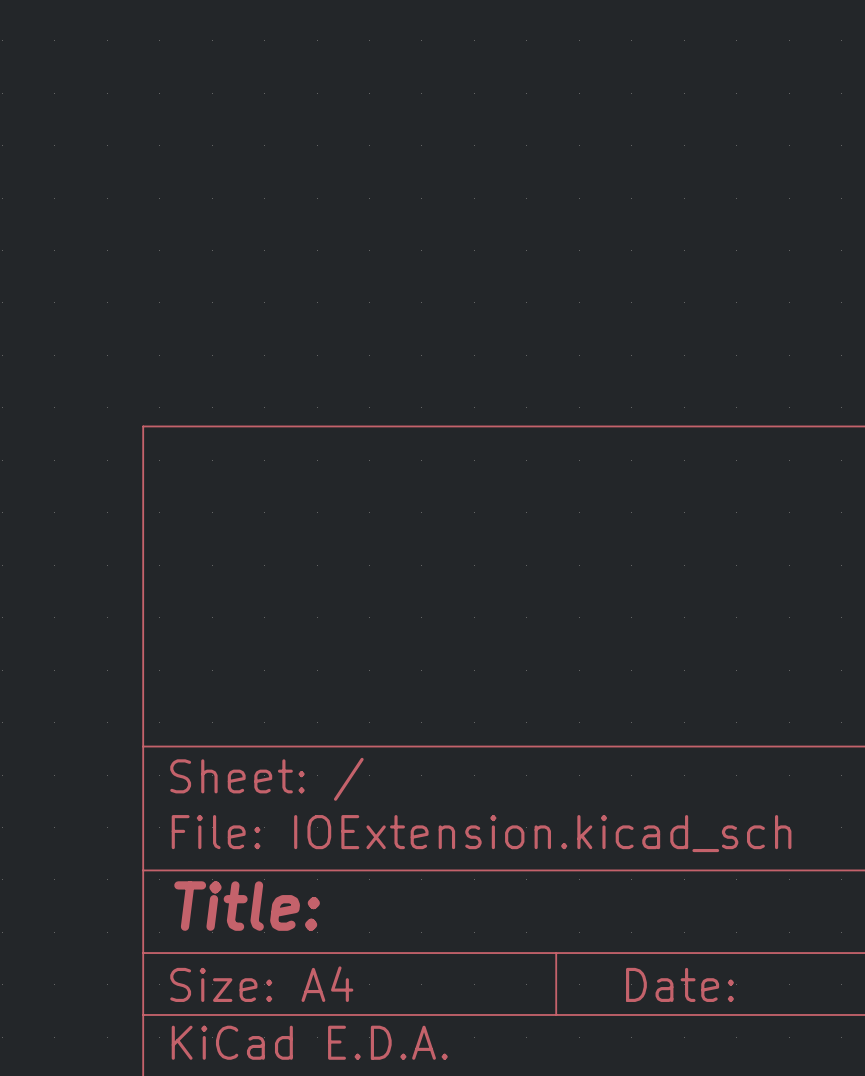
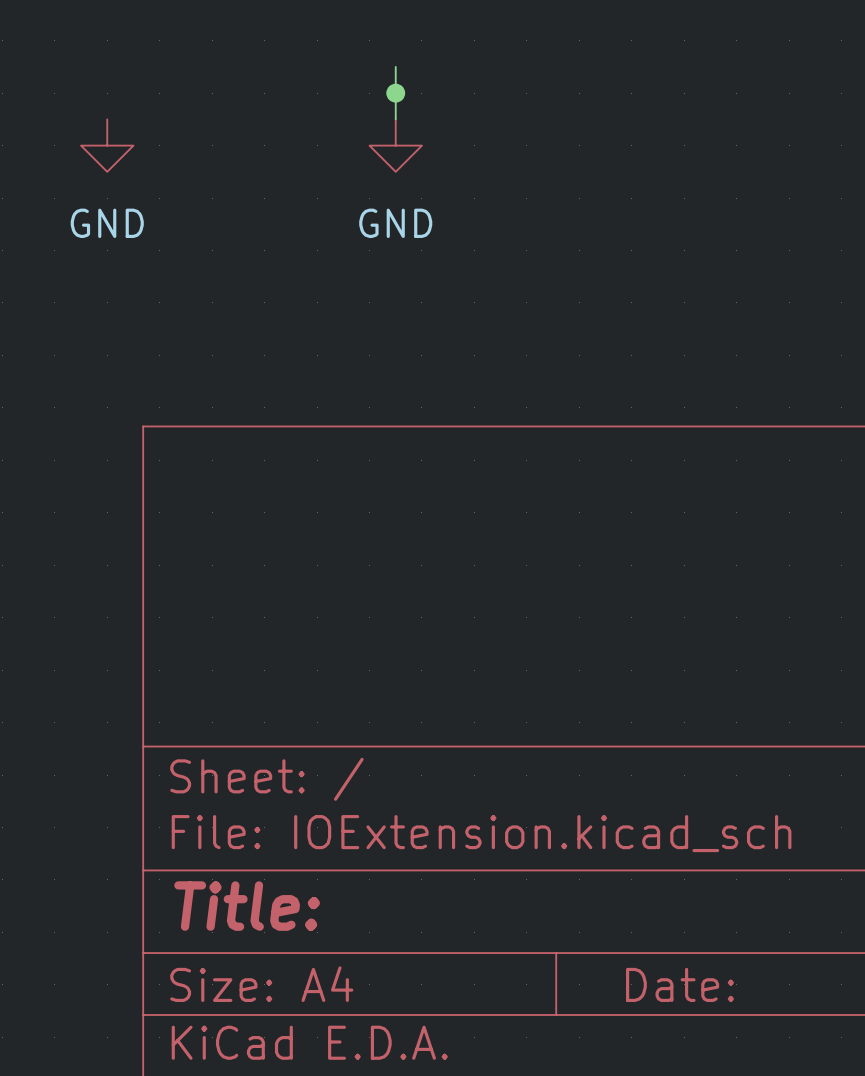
wire: none -> (395, 66) (395, 119)
junction: none -> (395, 93)
power symbol: none -> GND (107, 145)
power symbol: none -> GND (395, 145)

